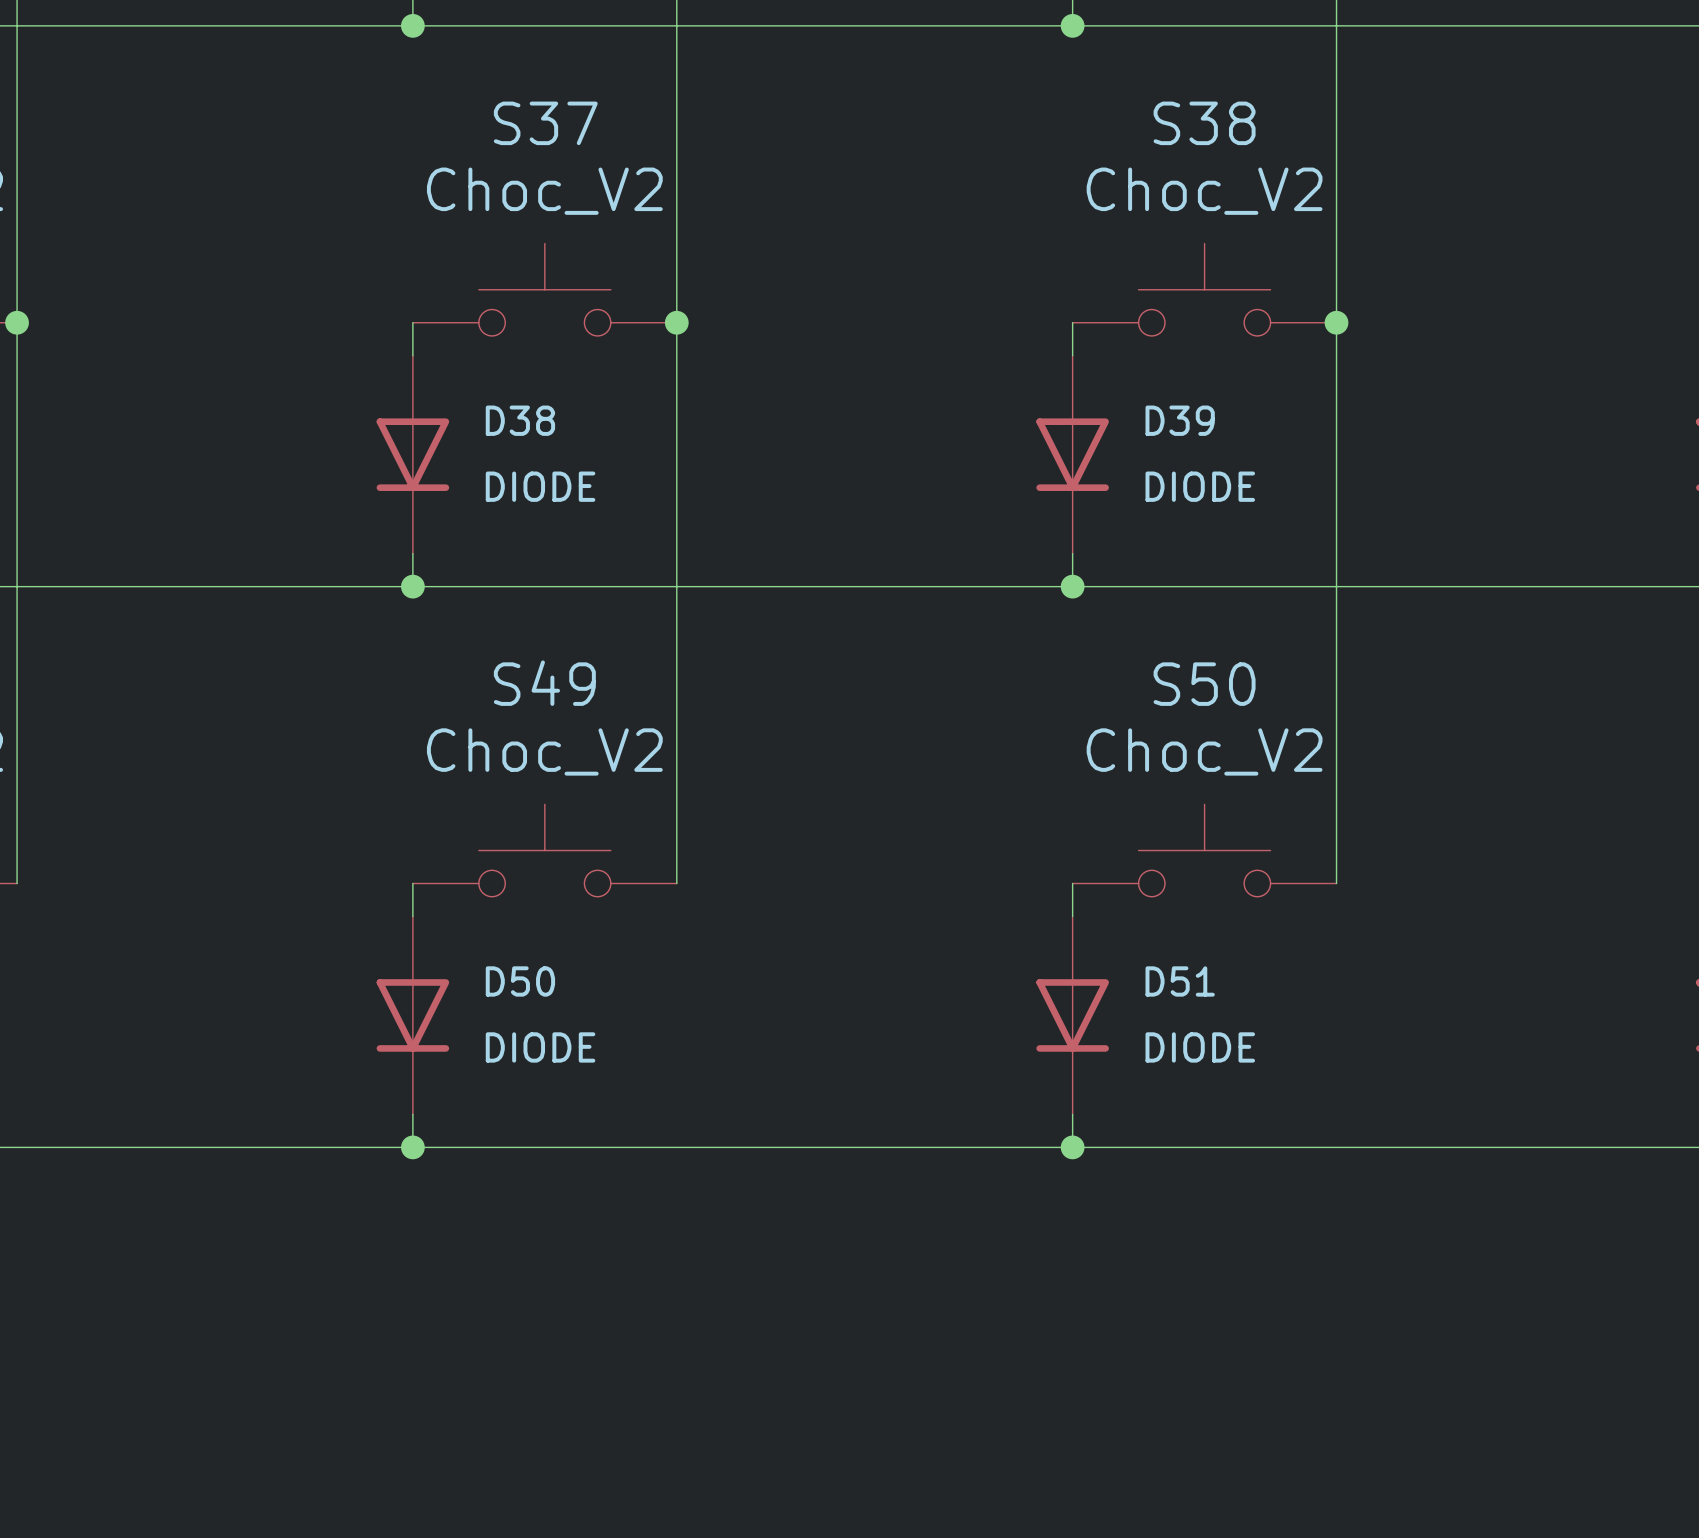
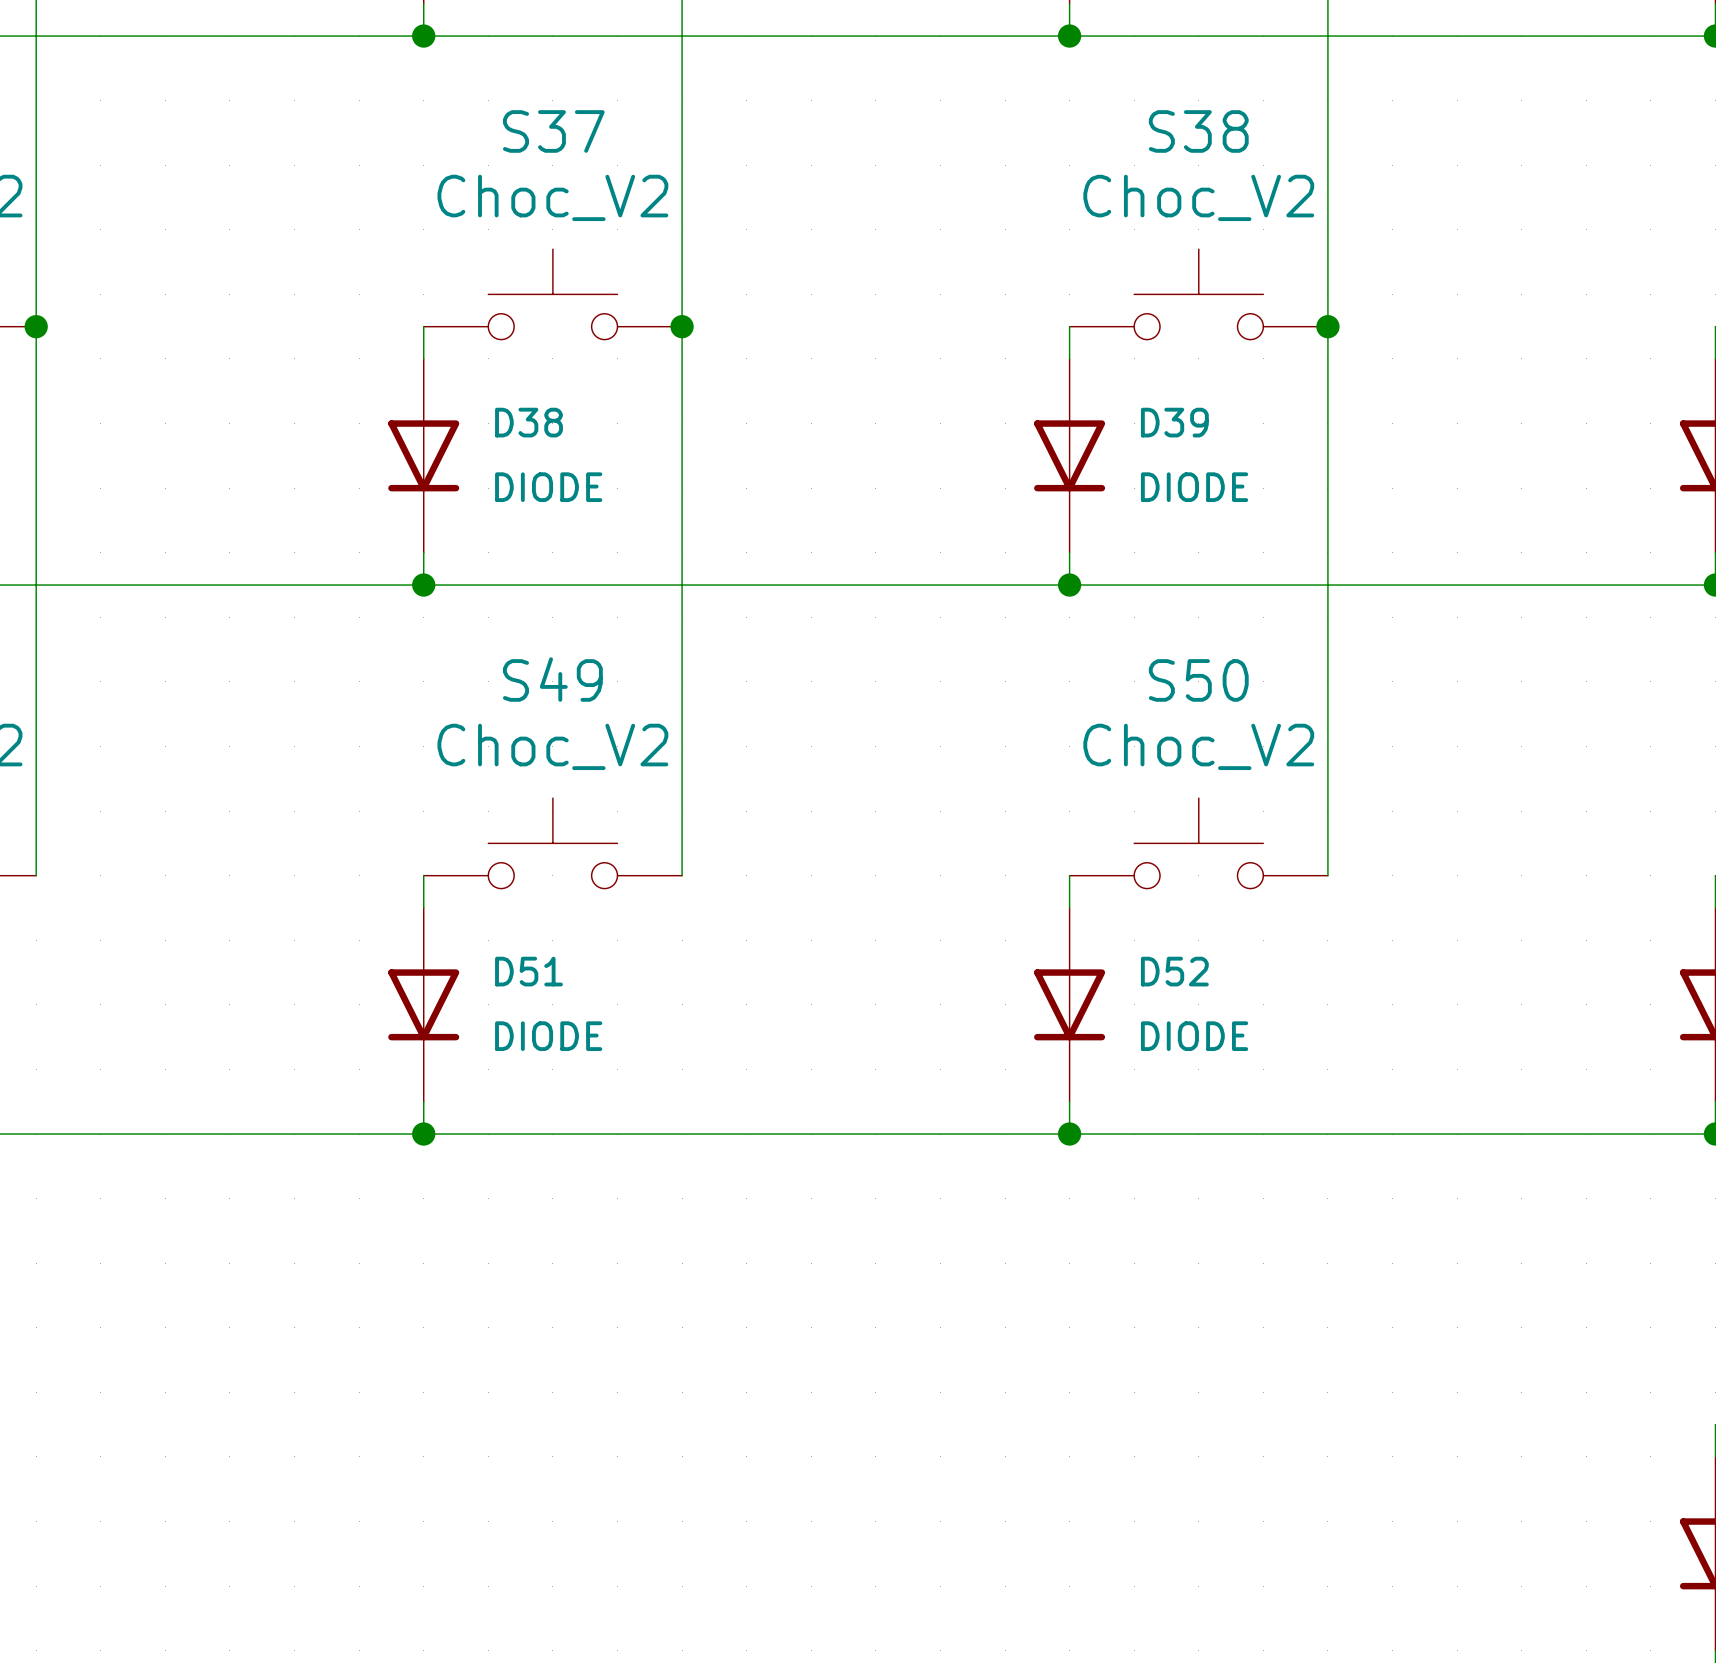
D50 name: D50 (520, 981) -> D51 (529, 971)
D51 name: D51 (1180, 981) -> D52 (1174, 971)

